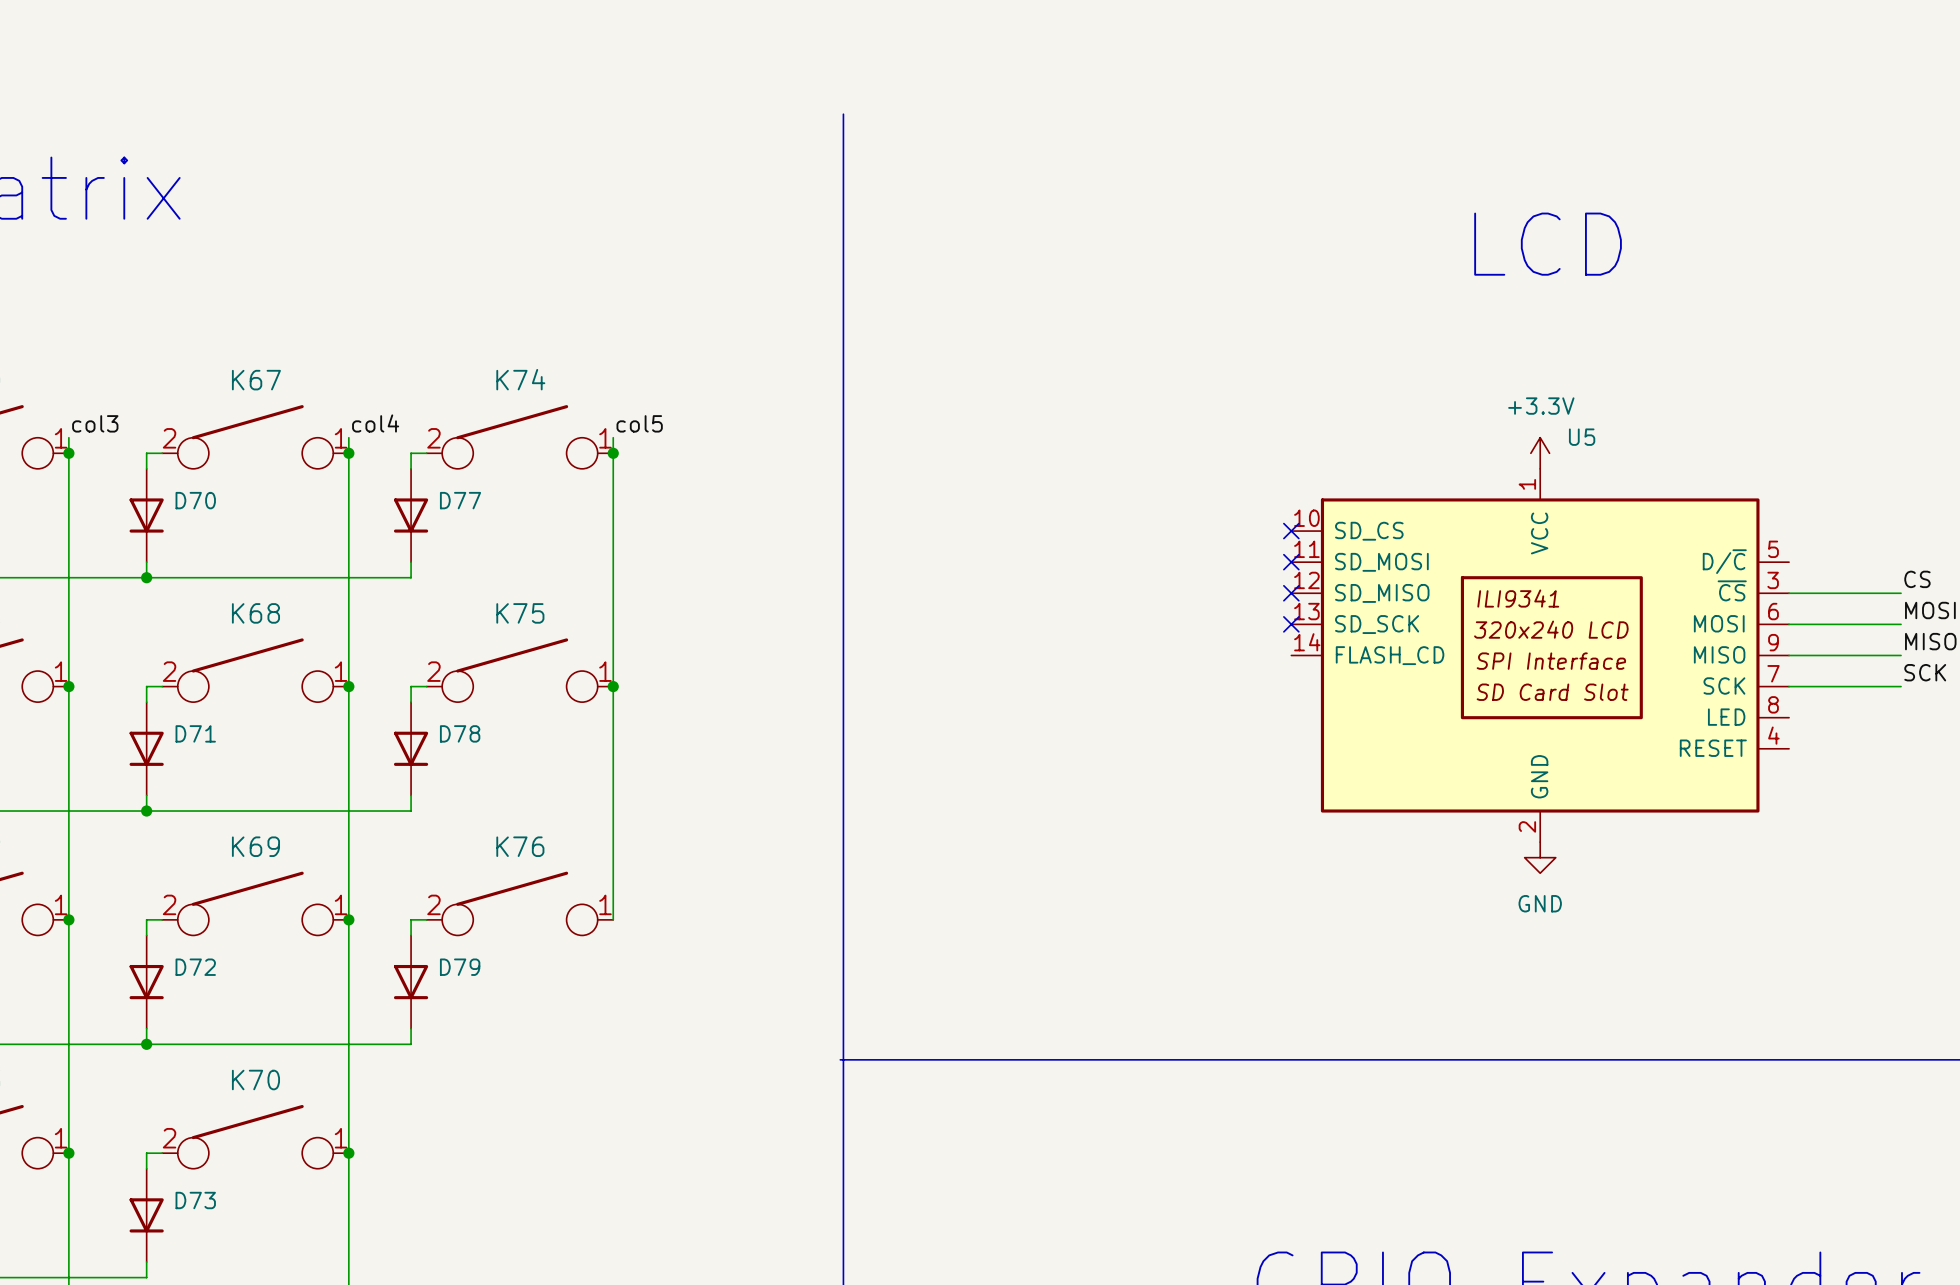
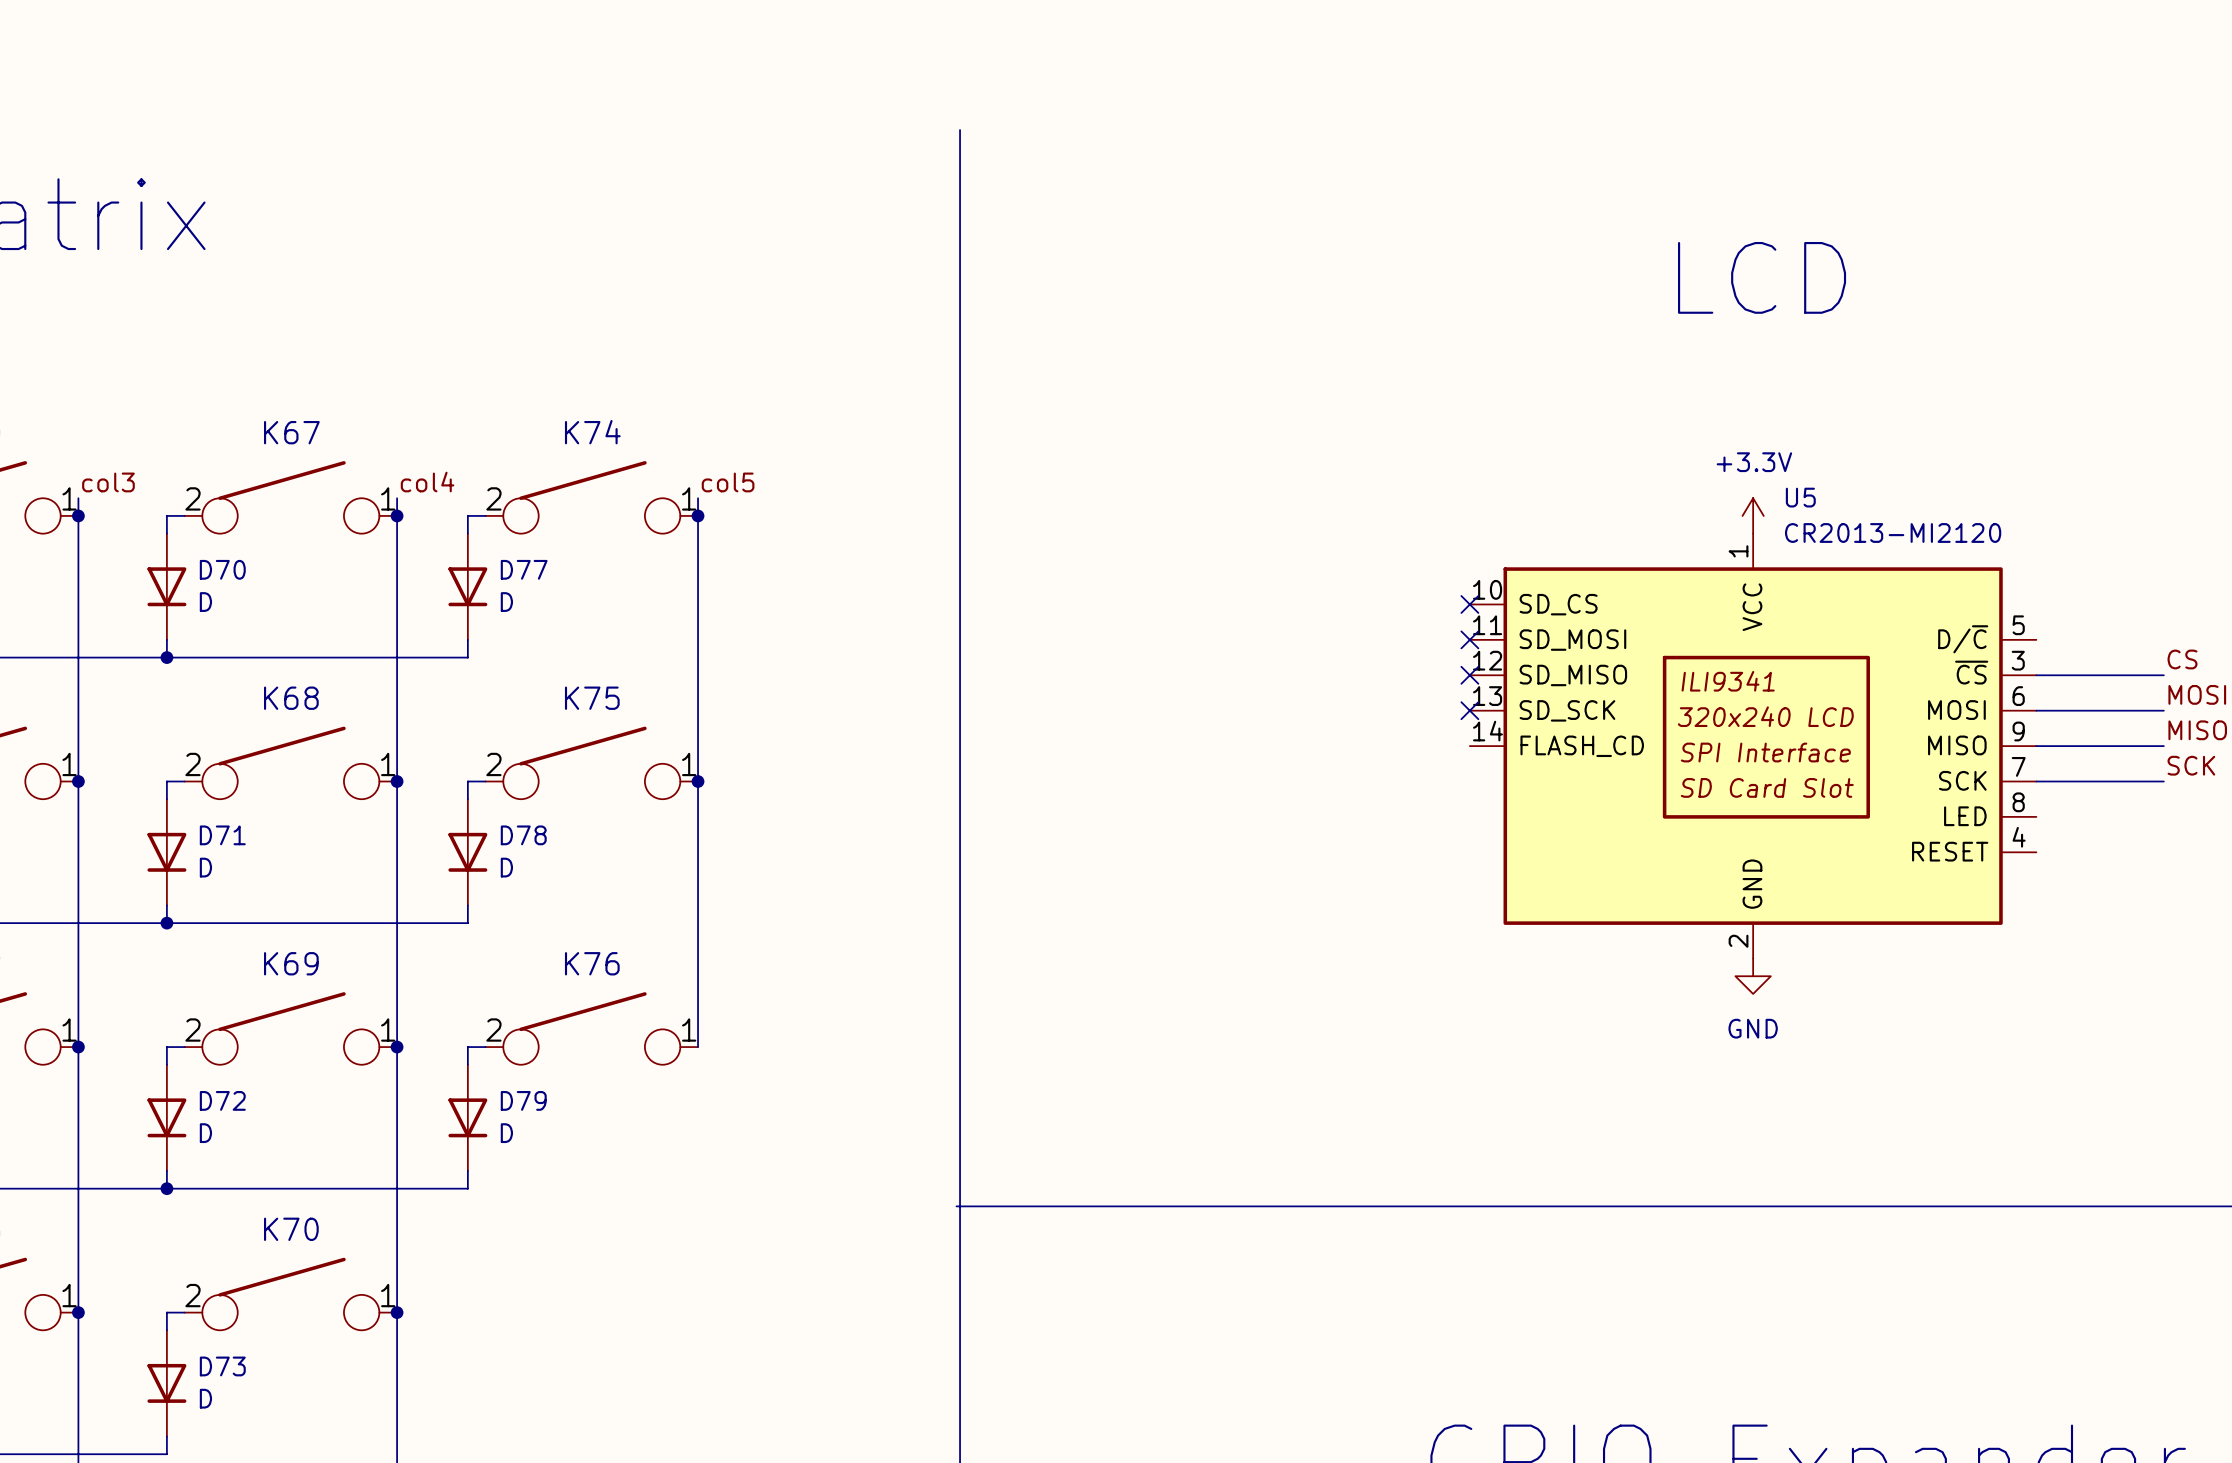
U5 value: none -> CR2013-MI2120 (1893, 532)
D70 value: none -> D (205, 602)
D77 value: none -> D (506, 602)
D71 value: none -> D (205, 867)
D78 value: none -> D (506, 867)
D72 value: none -> D (205, 1133)
D79 value: none -> D (506, 1133)
D73 value: none -> D (205, 1398)

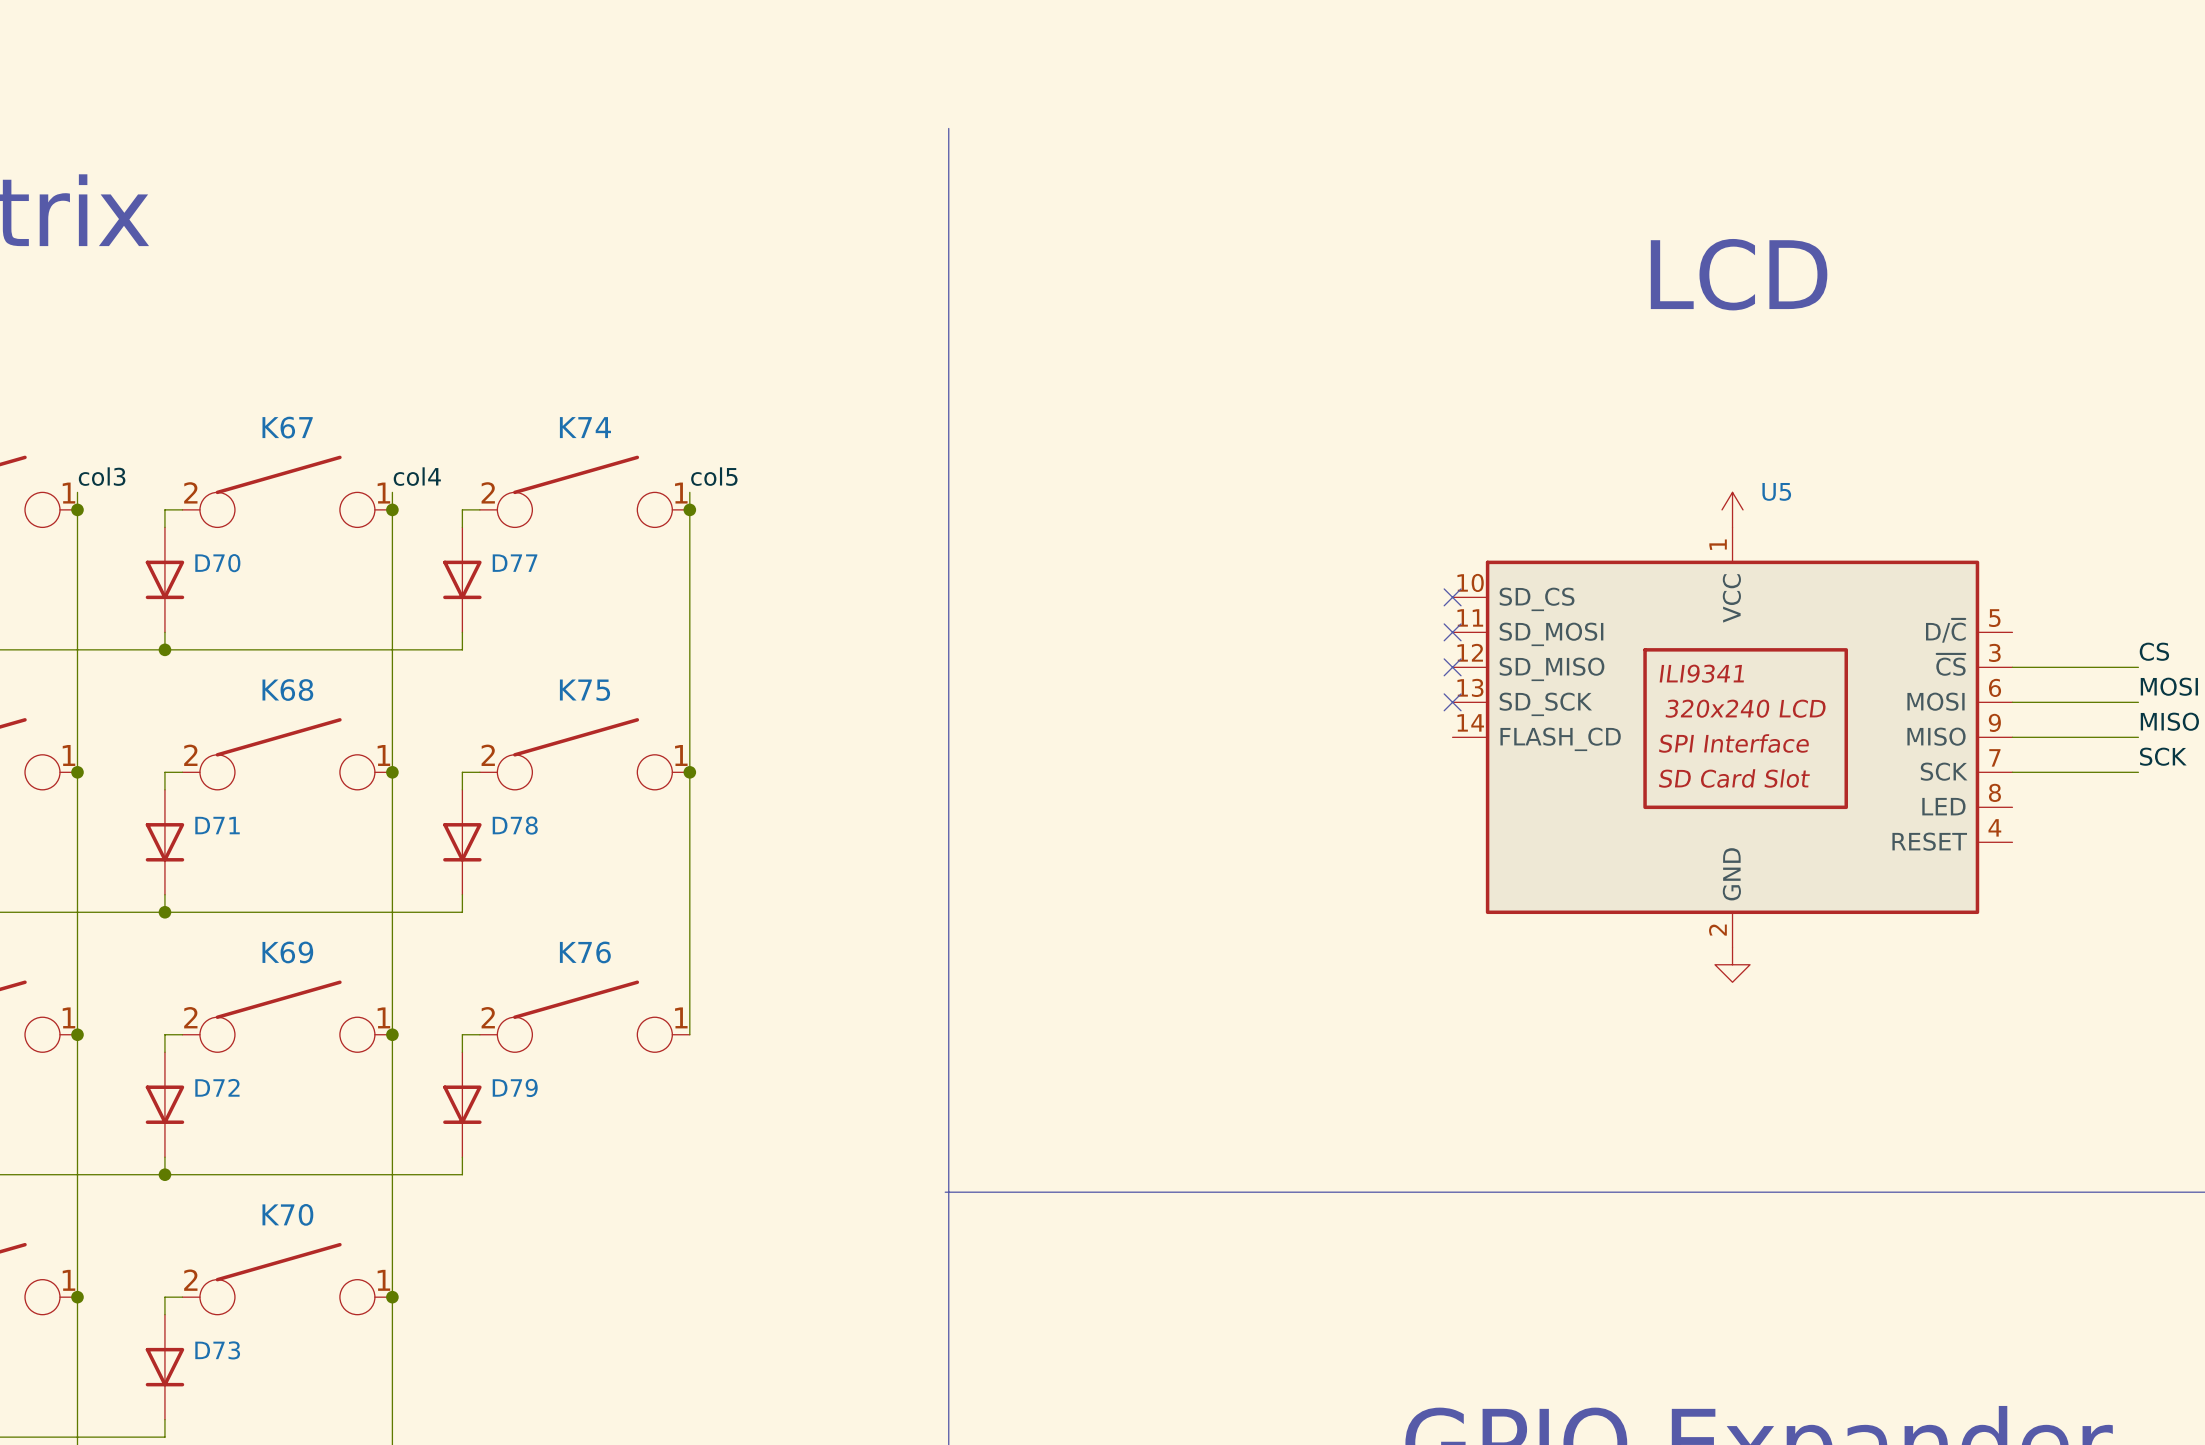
power symbol text: +3.3V (1754, 462) -> none
U5 value: CR2013-MI2120 (1893, 532) -> none
D70 value: D (205, 602) -> none
D77 value: D (506, 602) -> none
D71 value: D (205, 867) -> none
D78 value: D (506, 867) -> none
power symbol text: GND (1753, 1028) -> none
D72 value: D (205, 1133) -> none
D79 value: D (506, 1133) -> none
D73 value: D (205, 1398) -> none

